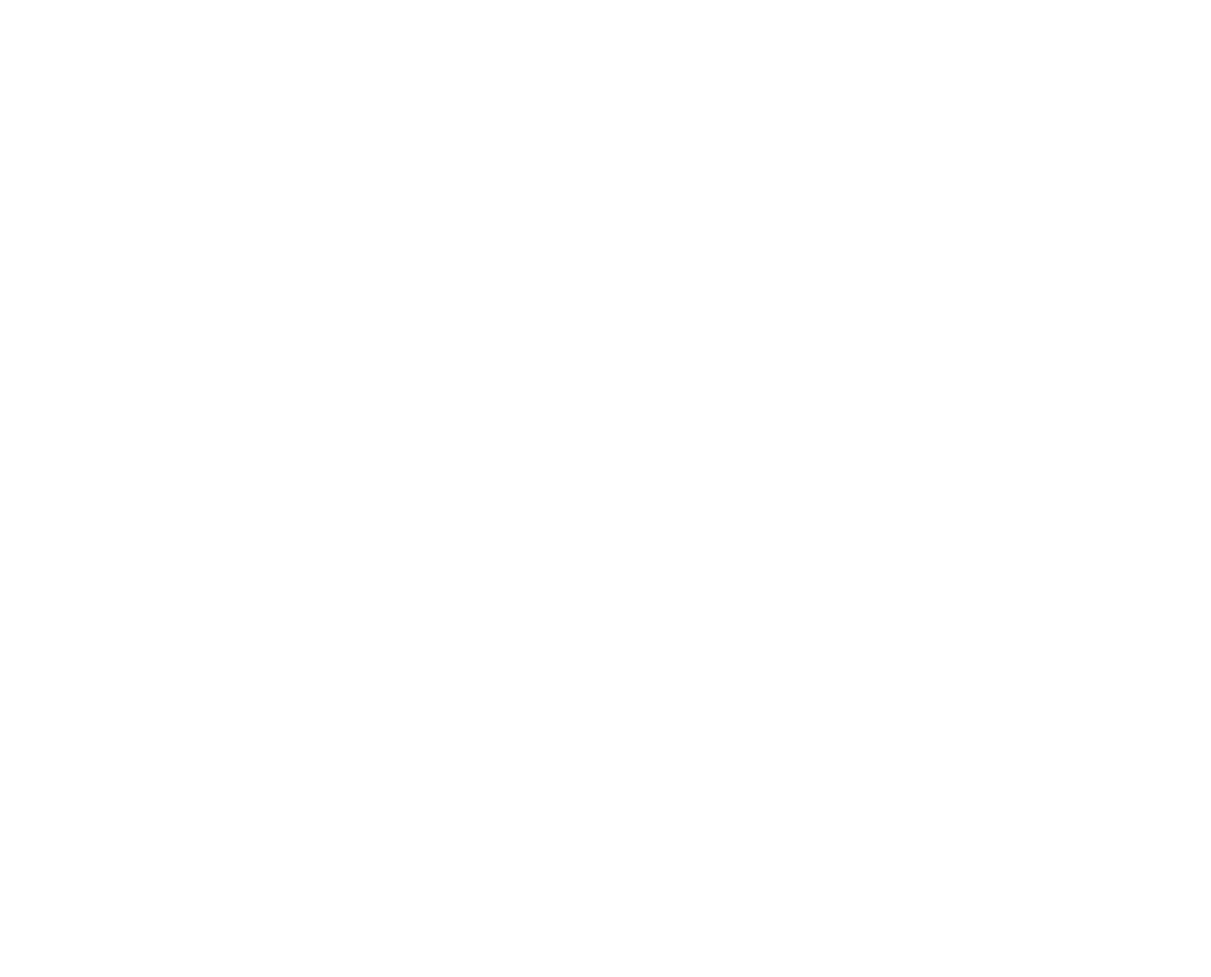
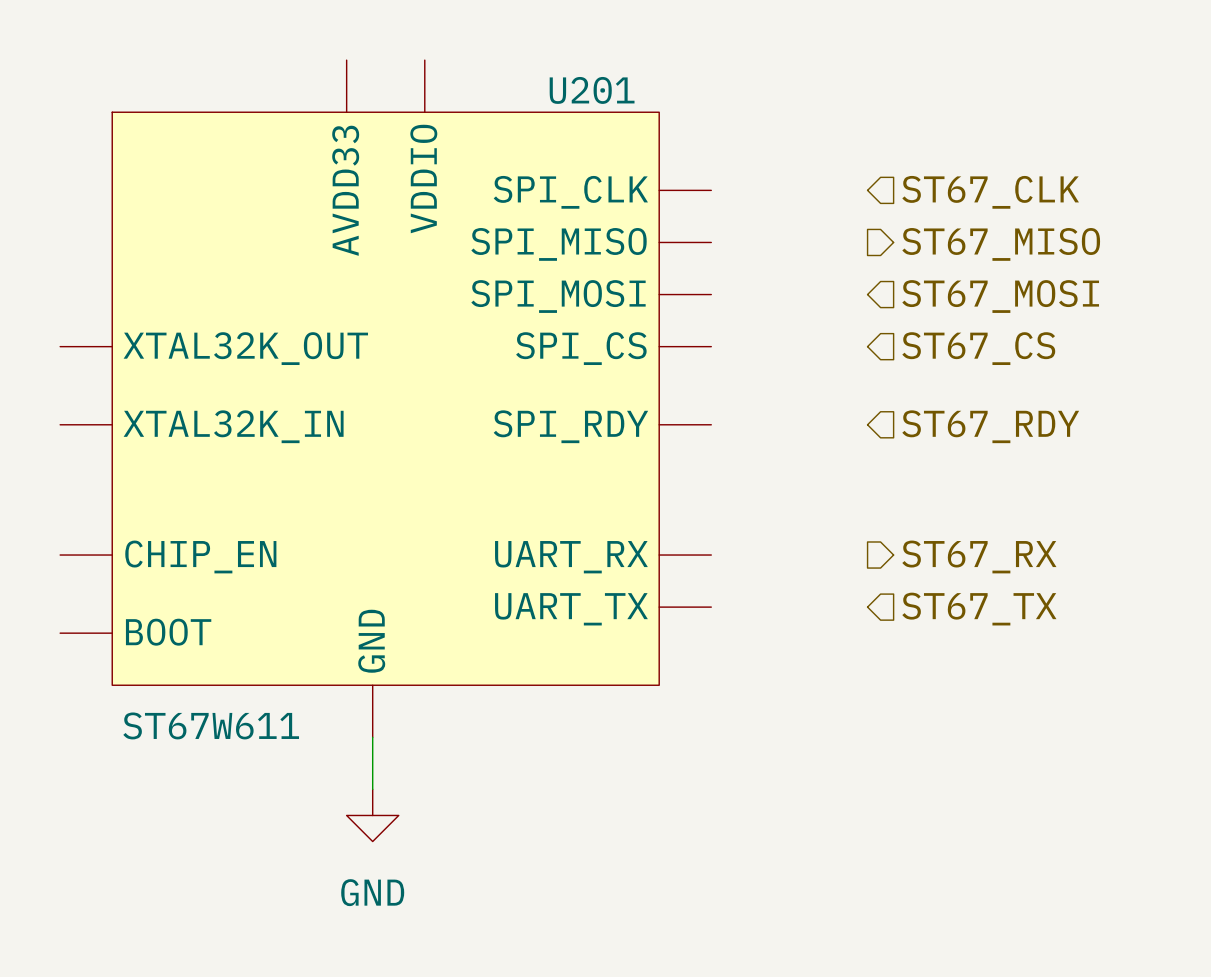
hierarchical label: none -> ST67_CLK (990, 192)
hierarchical label: none -> ST67_MISO (1001, 244)
hierarchical label: none -> ST67_MOSI (1000, 296)
hierarchical label: none -> ST67_CS (978, 348)
U201: none -> ST67W611 (385, 398)
hierarchical label: none -> ST67_RDY (990, 426)
hierarchical label: none -> ST67_RX (979, 556)
hierarchical label: none -> ST67_TX (979, 609)
wire: none -> (372, 737) (372, 789)
power symbol: none -> GND (372, 815)

